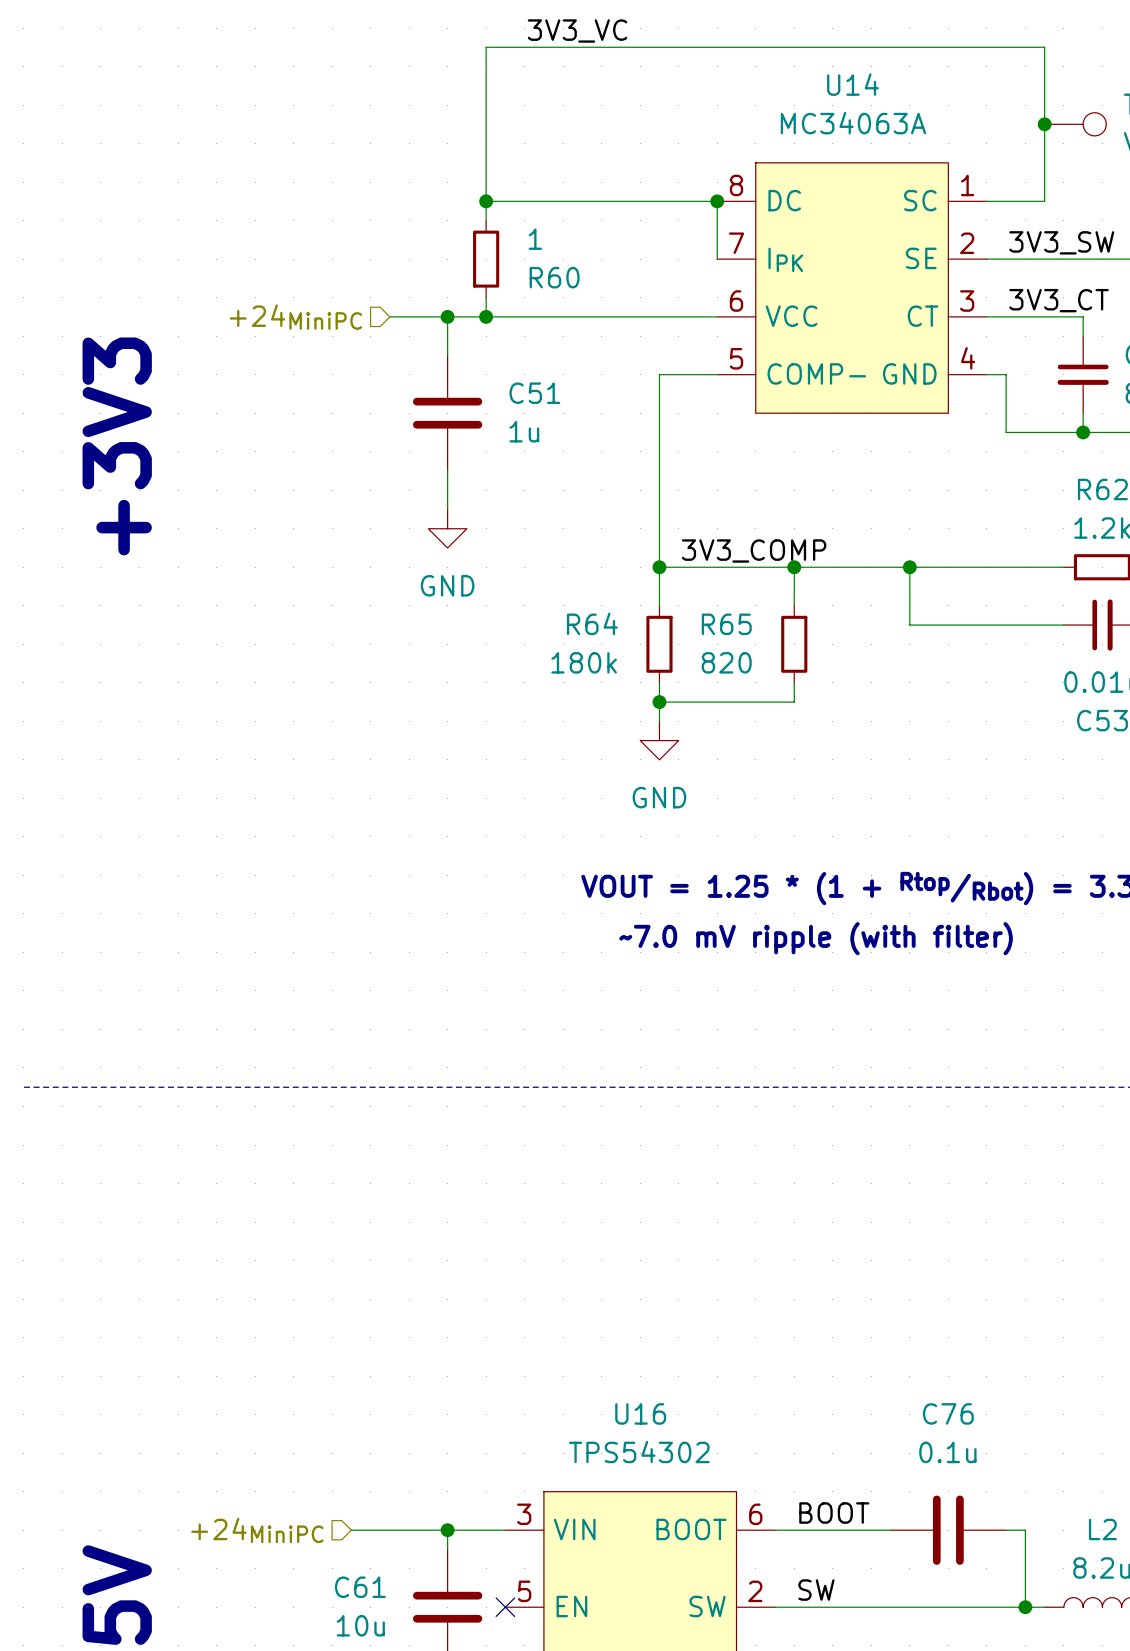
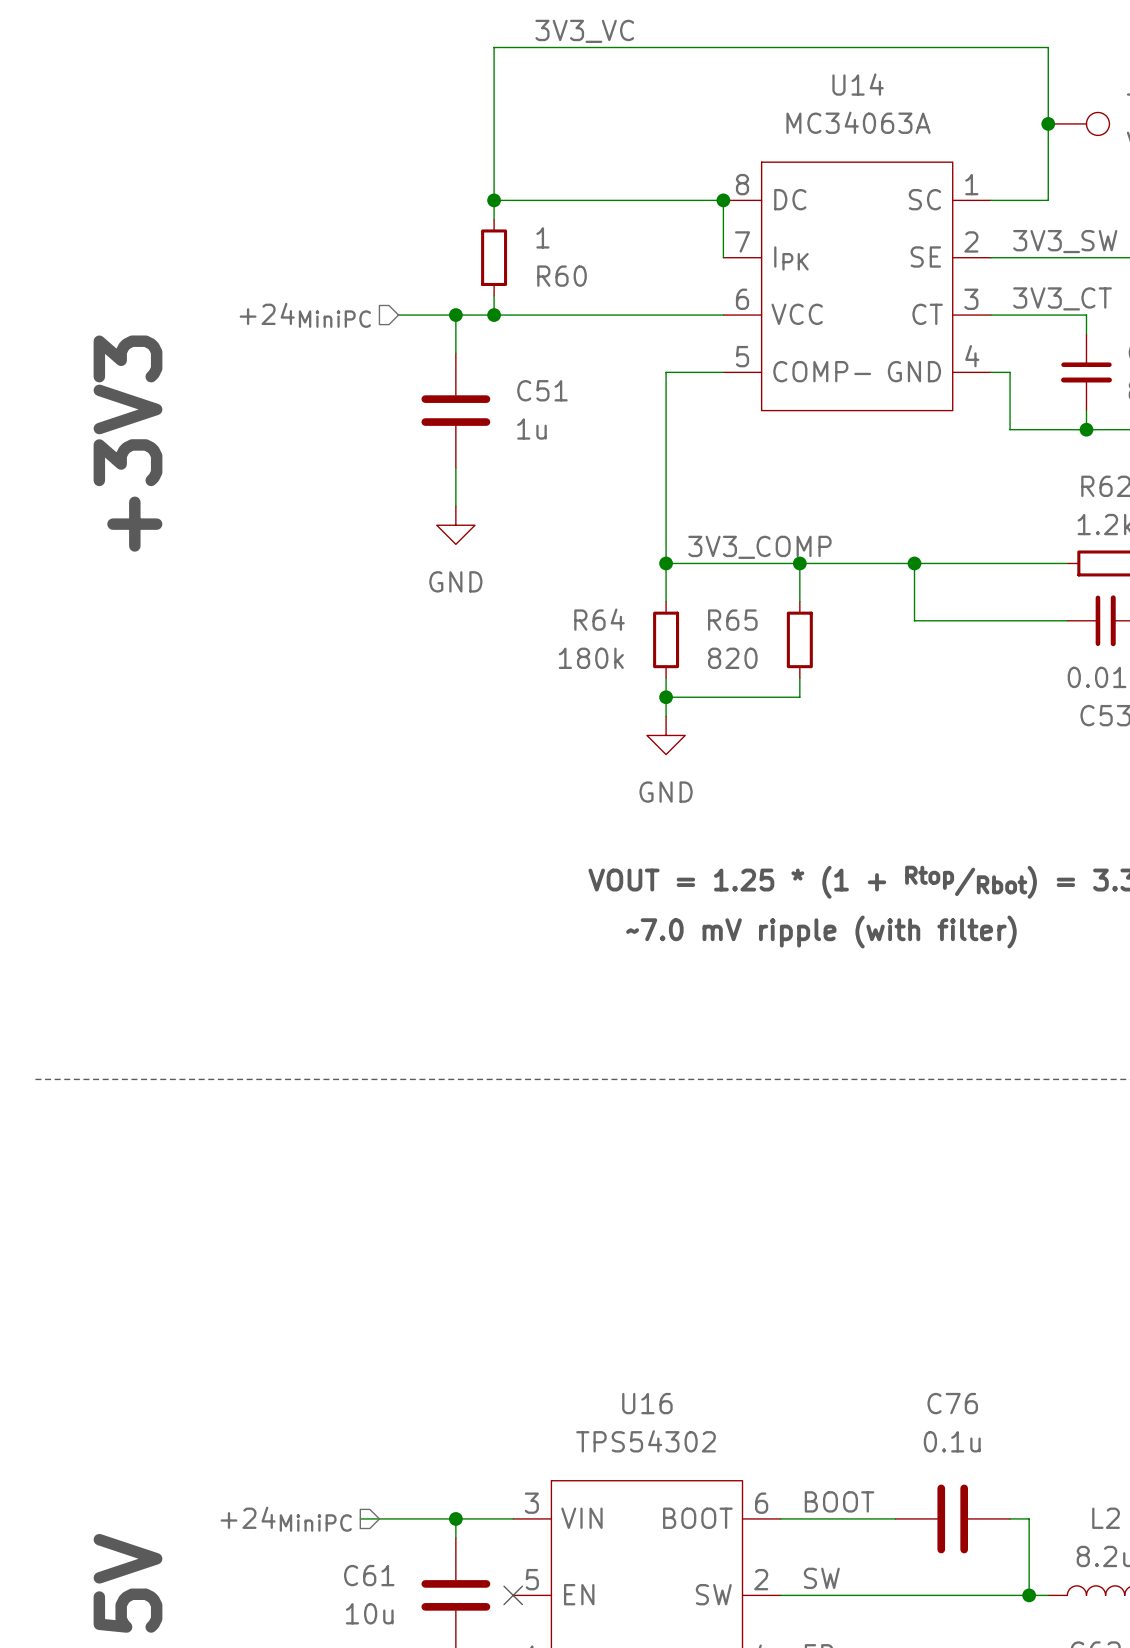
hierarchical label position: +24MiniPC (257, 1530) -> +24MiniPC (286, 1519)

